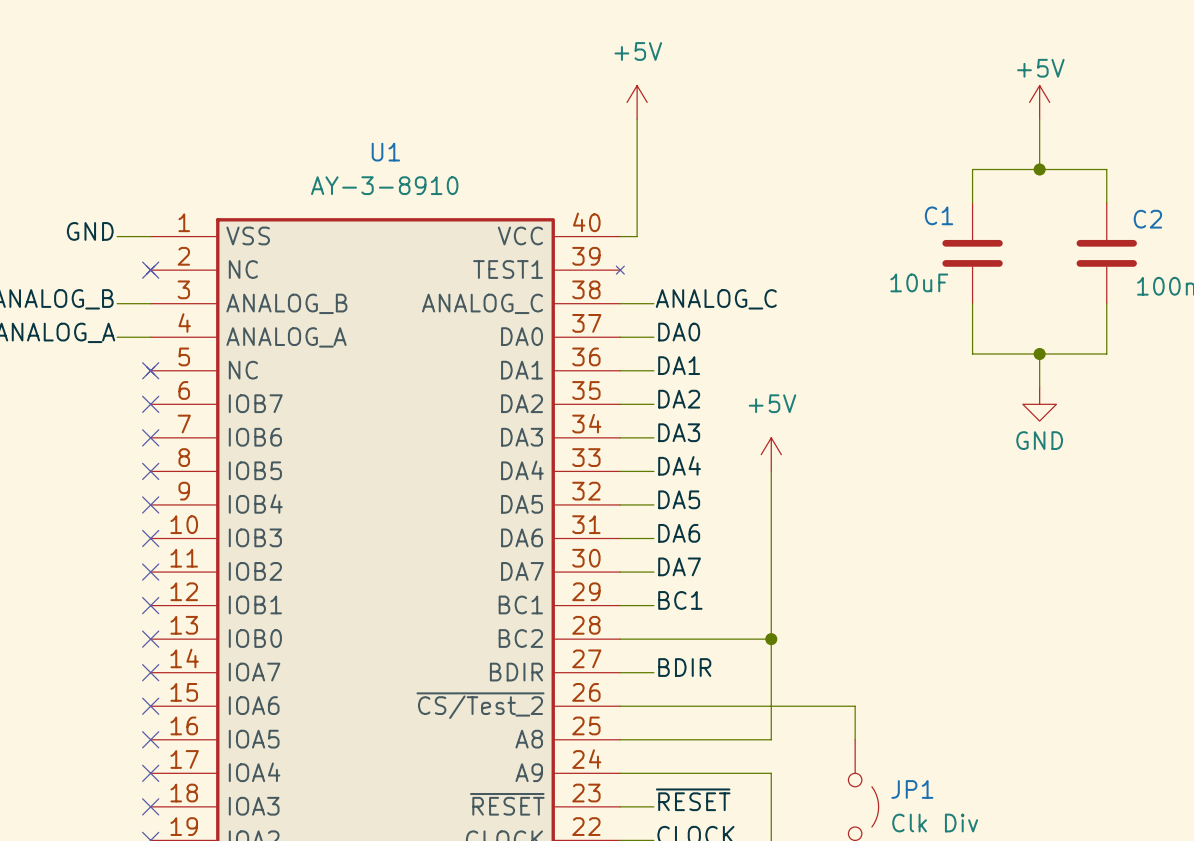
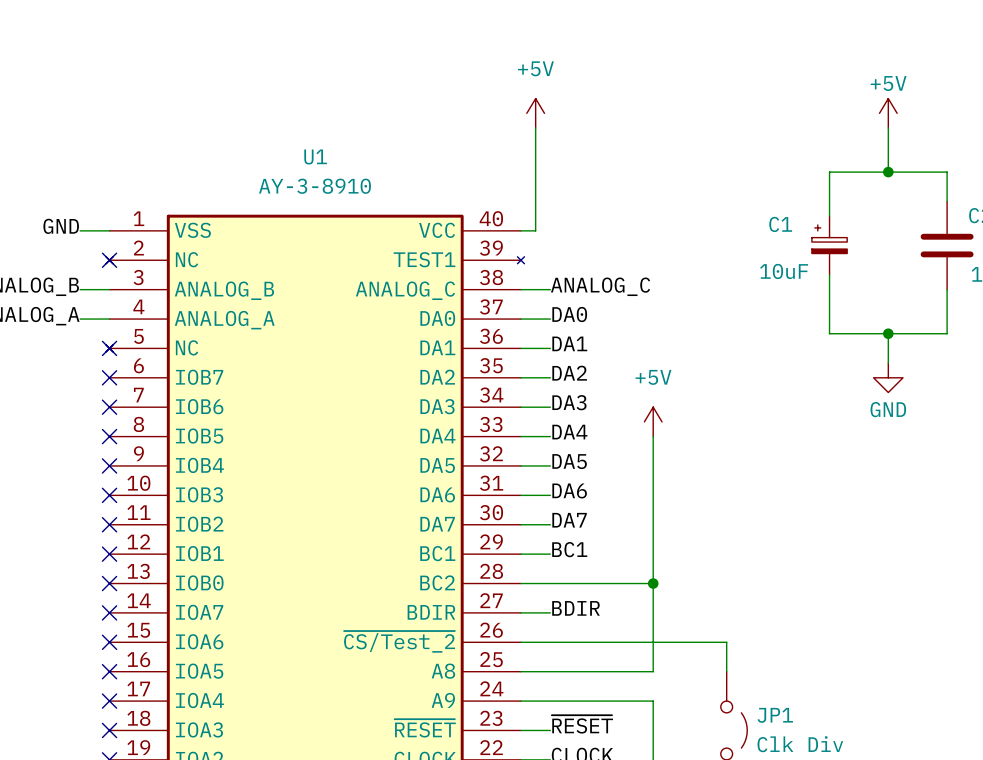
C1 symbol: [942, 203, 1003, 304] -> [811, 216, 848, 275]

